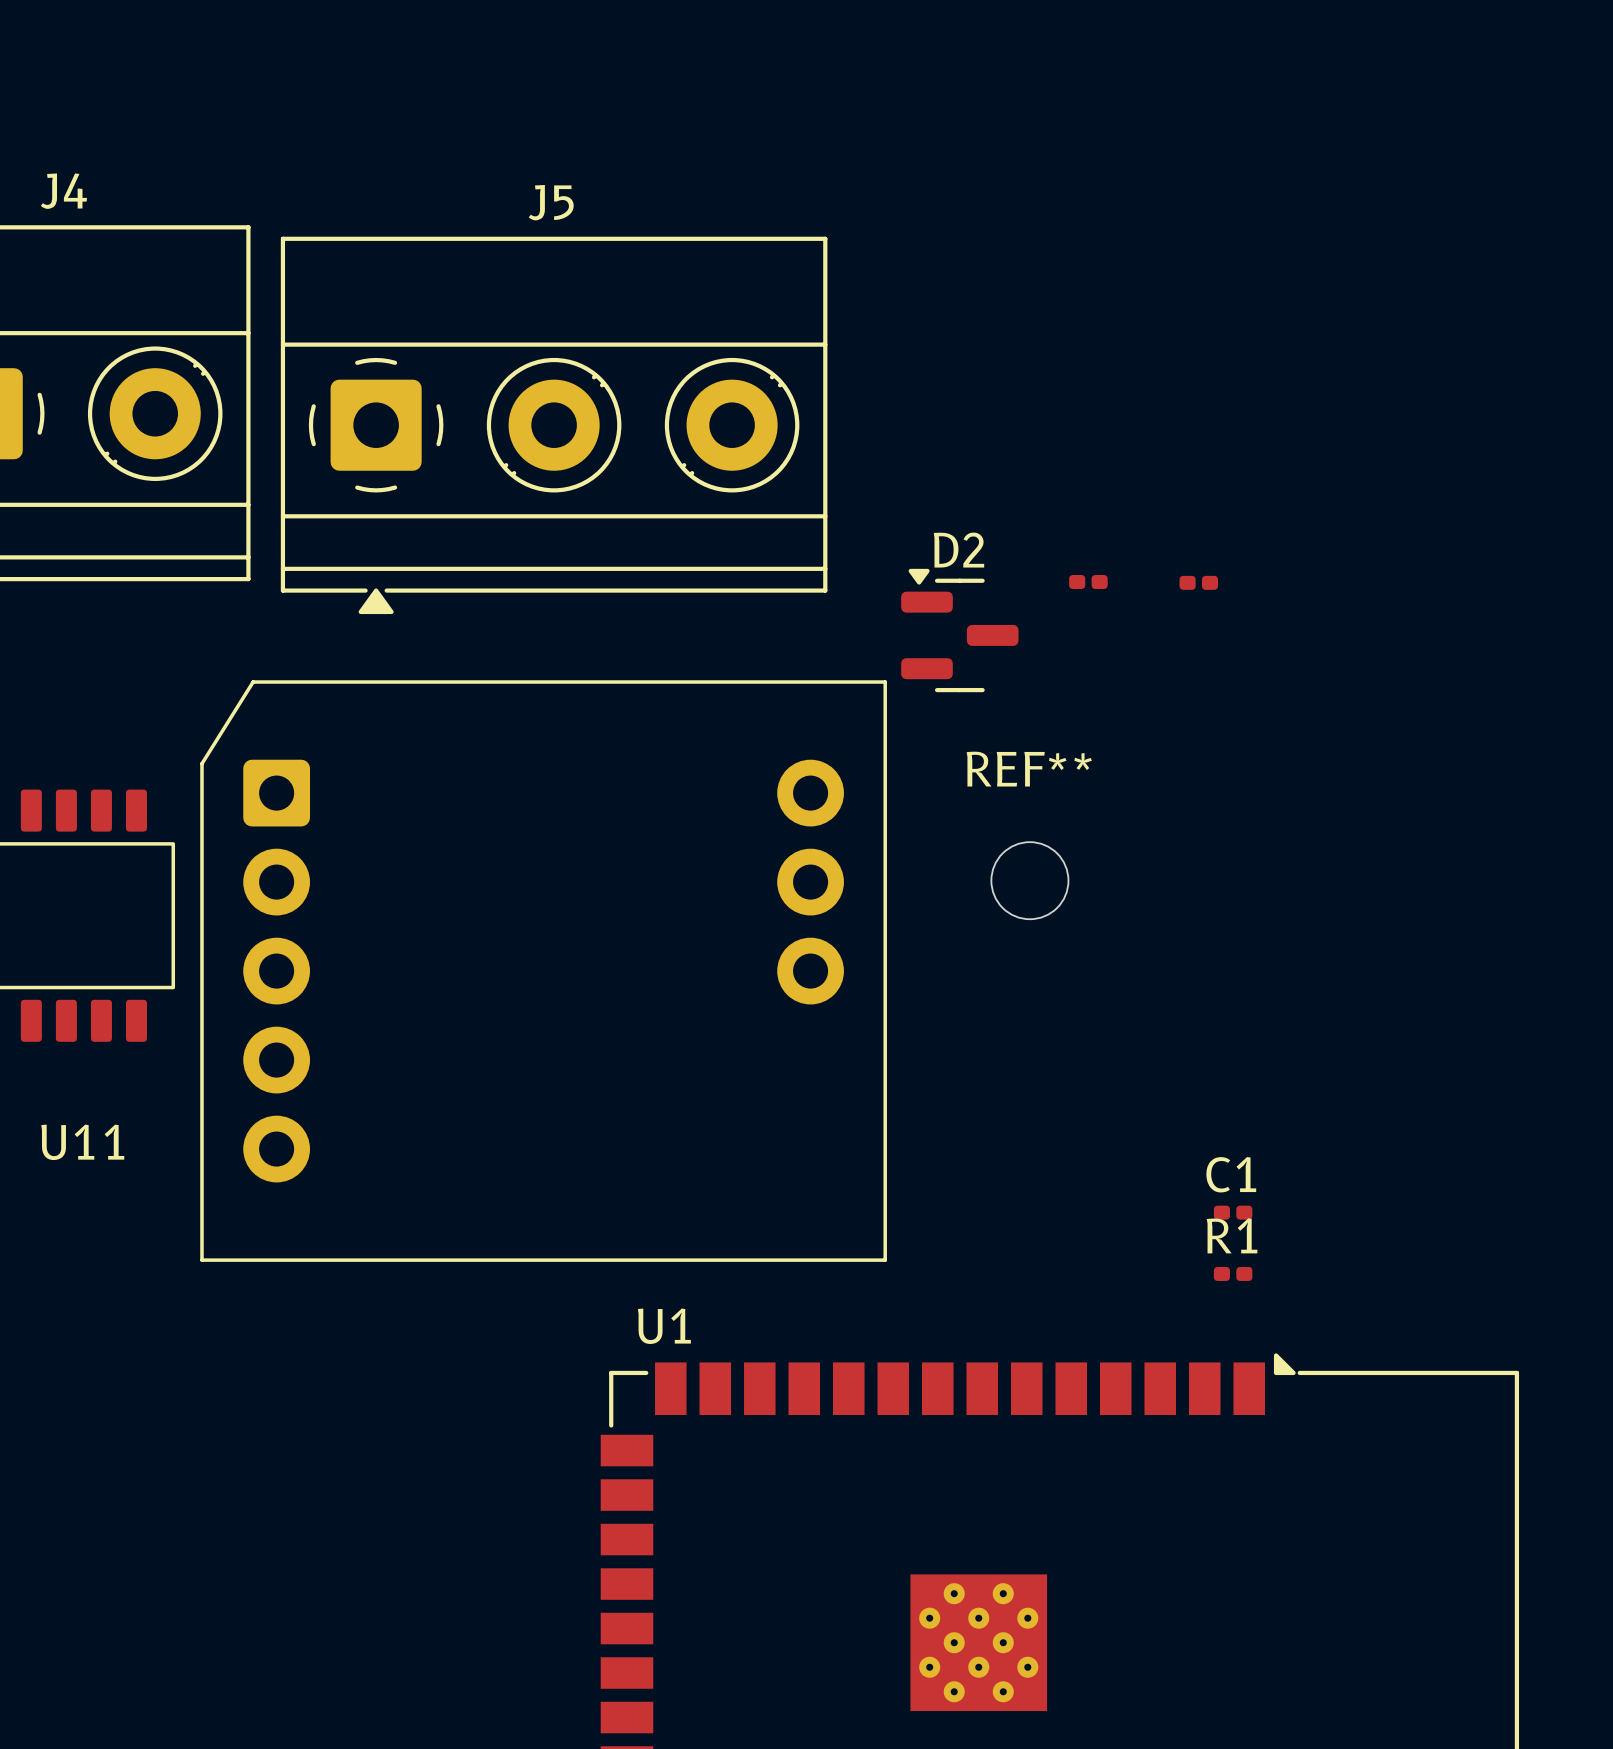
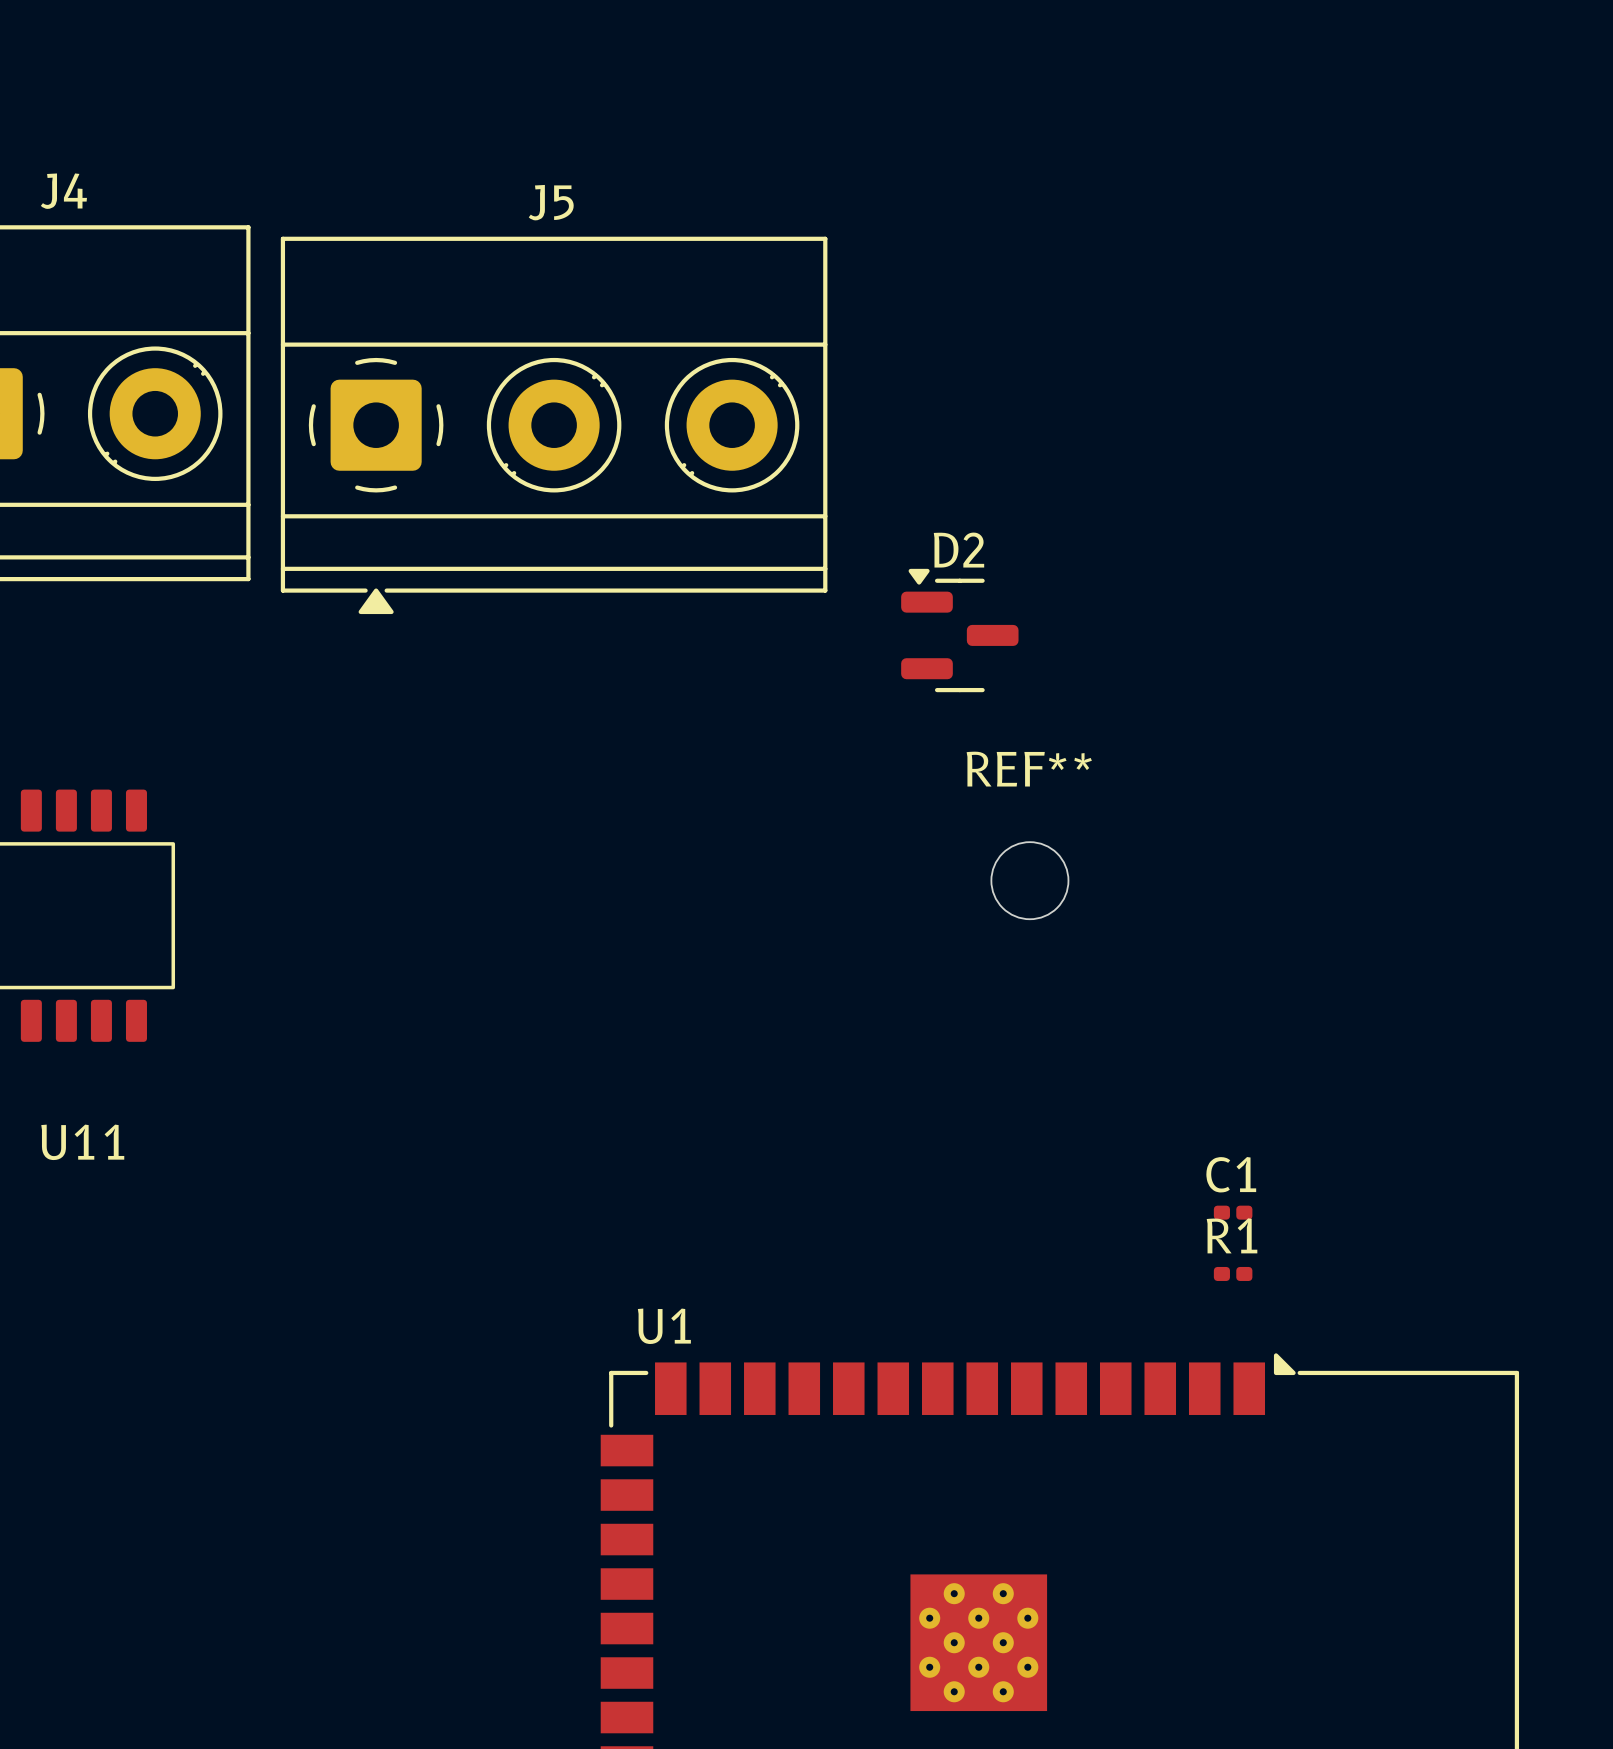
part: (1088, 581) -> none
part: (1198, 582) -> none
part: (543, 971) -> none

